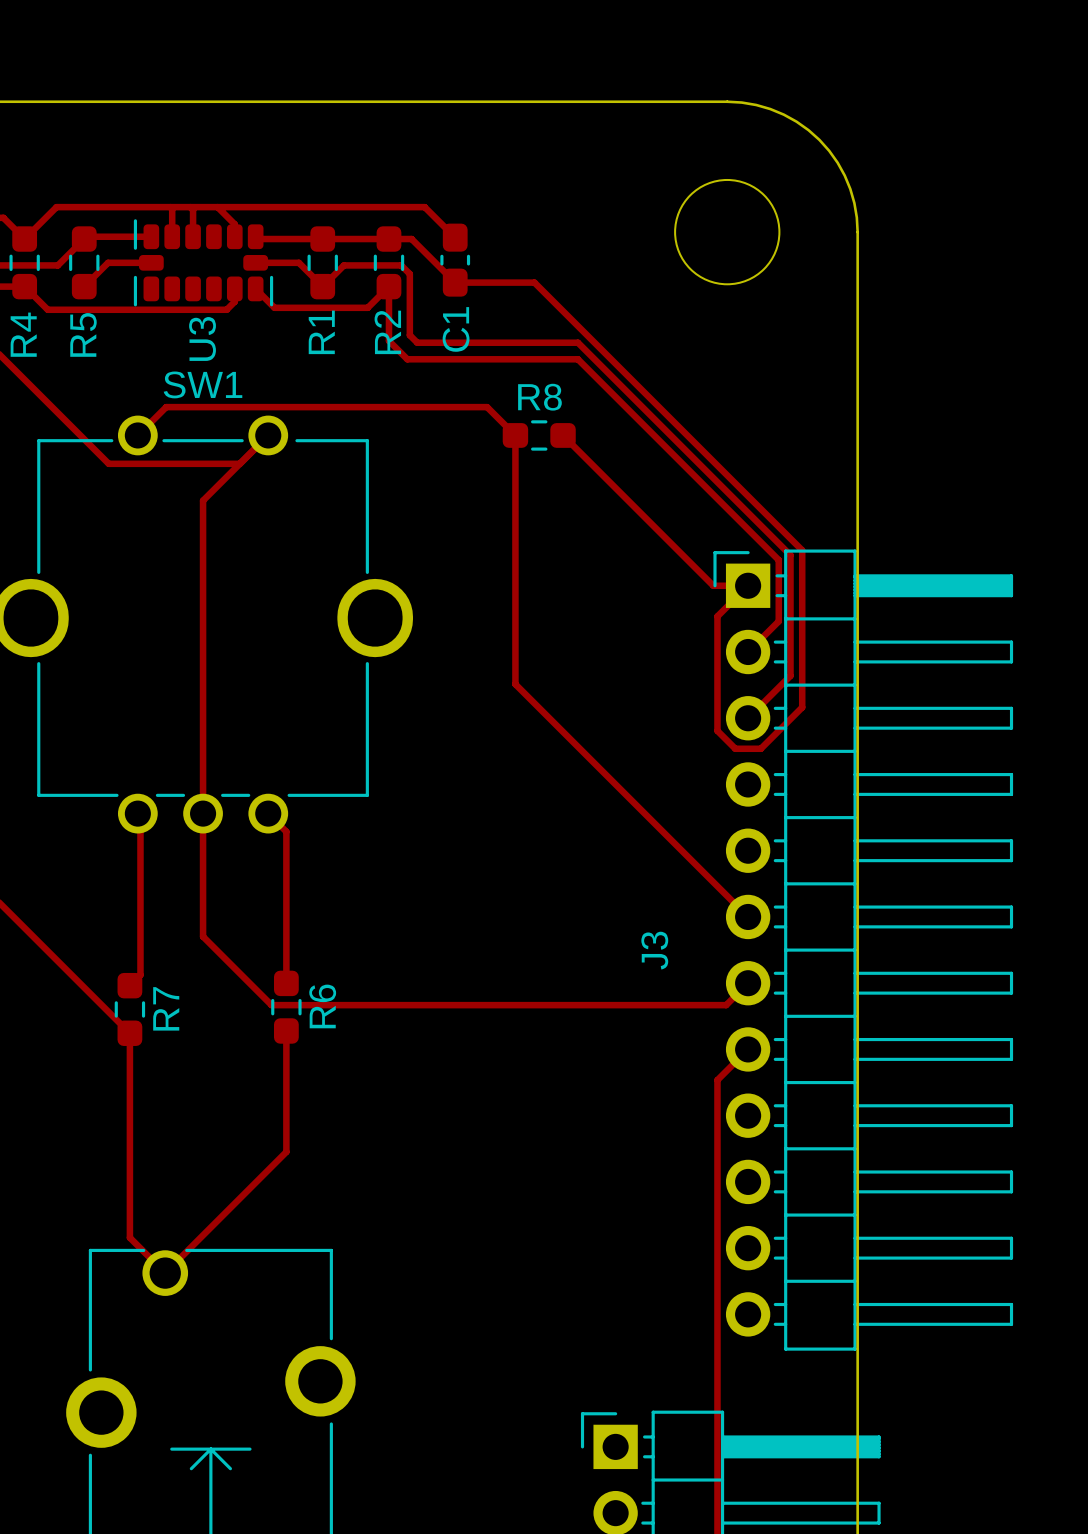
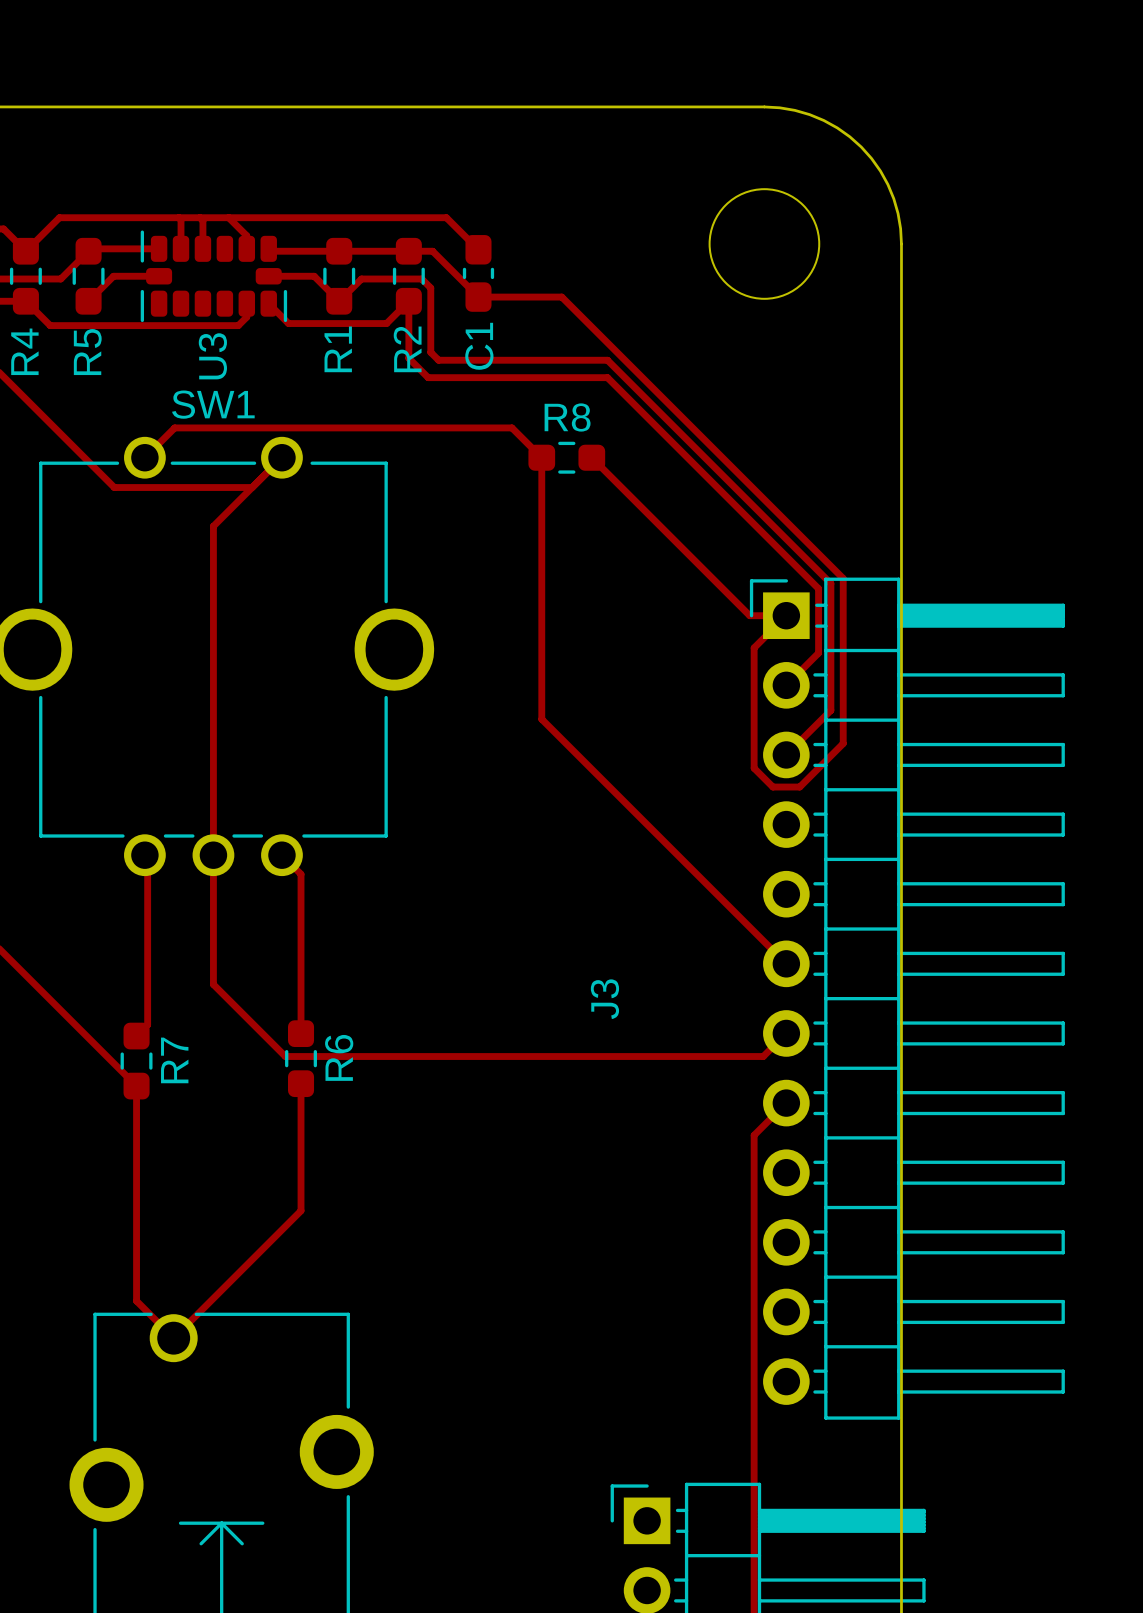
J3 name position: J3 (654, 950) -> J3 (604, 999)

